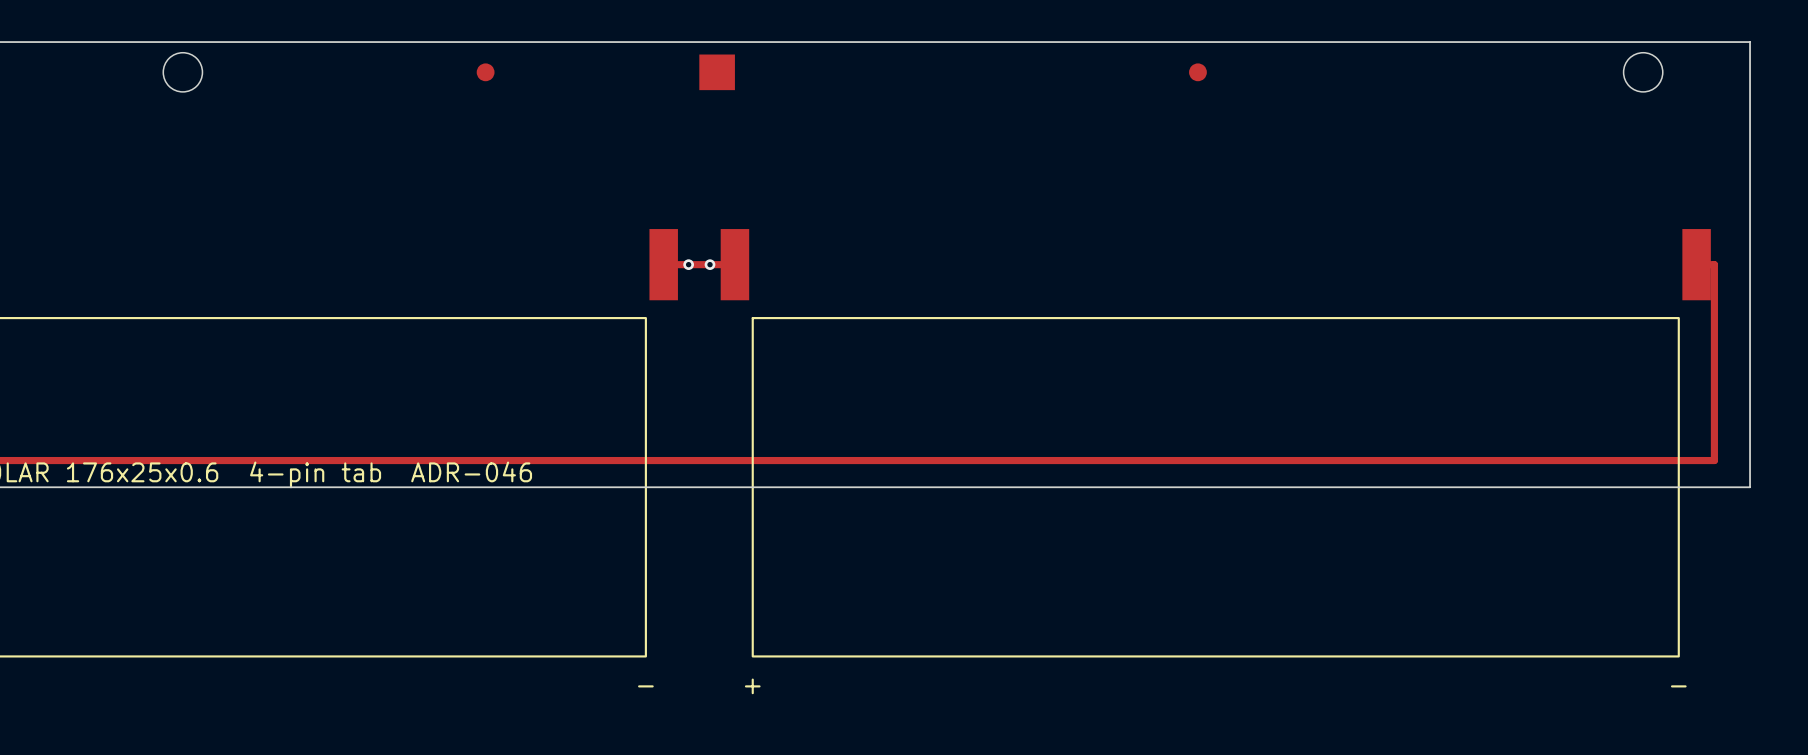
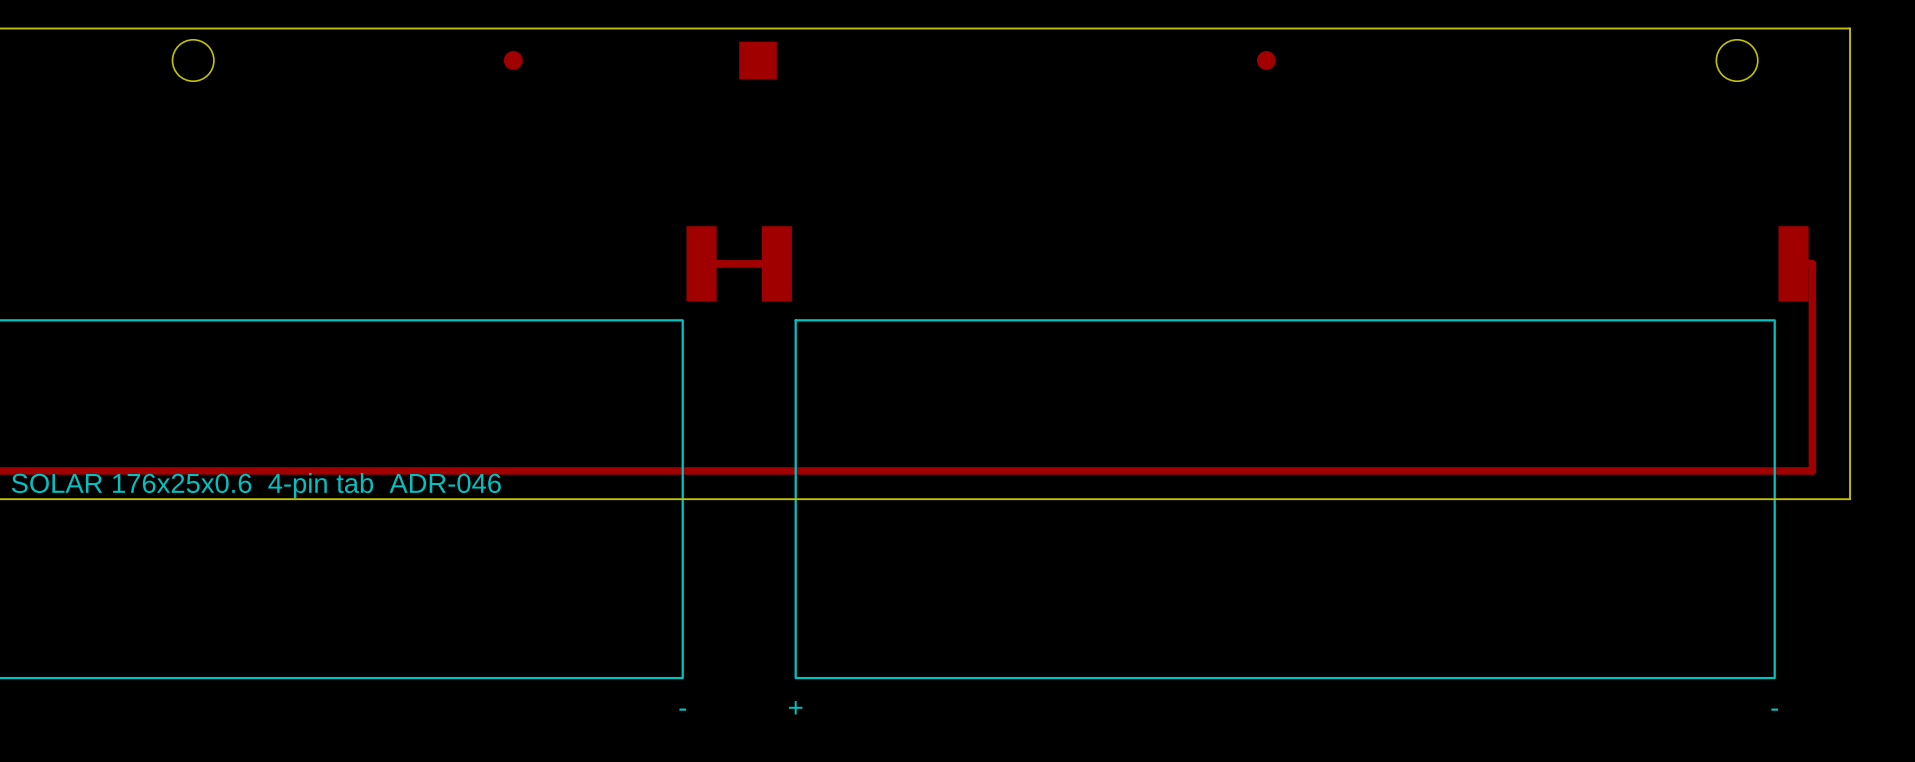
via: (688, 264) -> none
via: (710, 264) -> none

